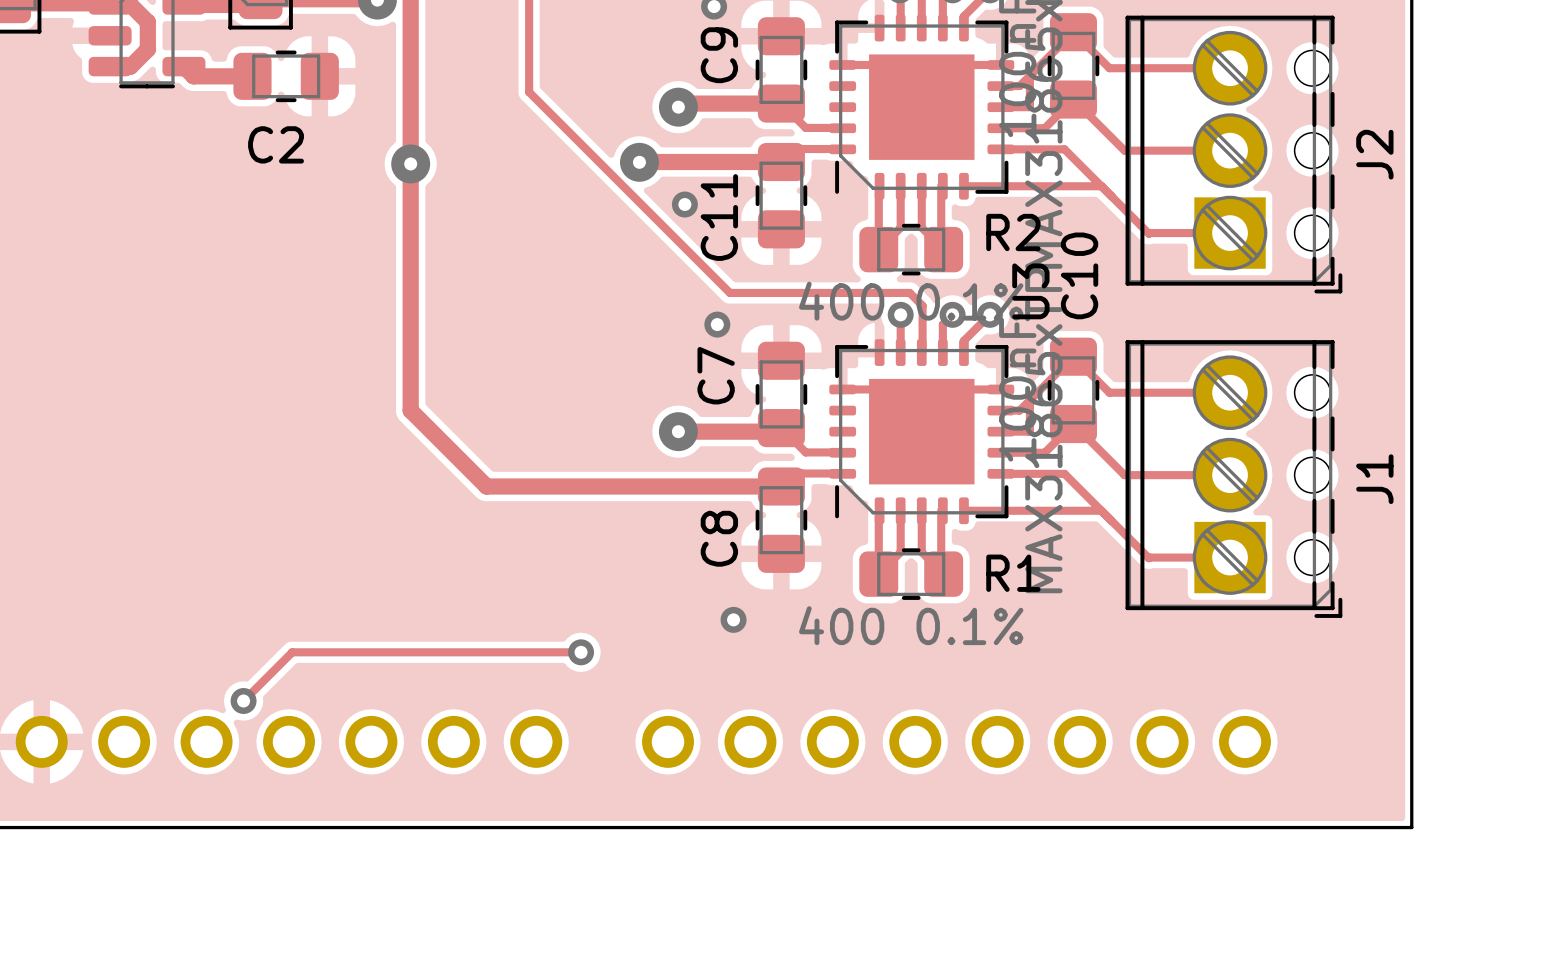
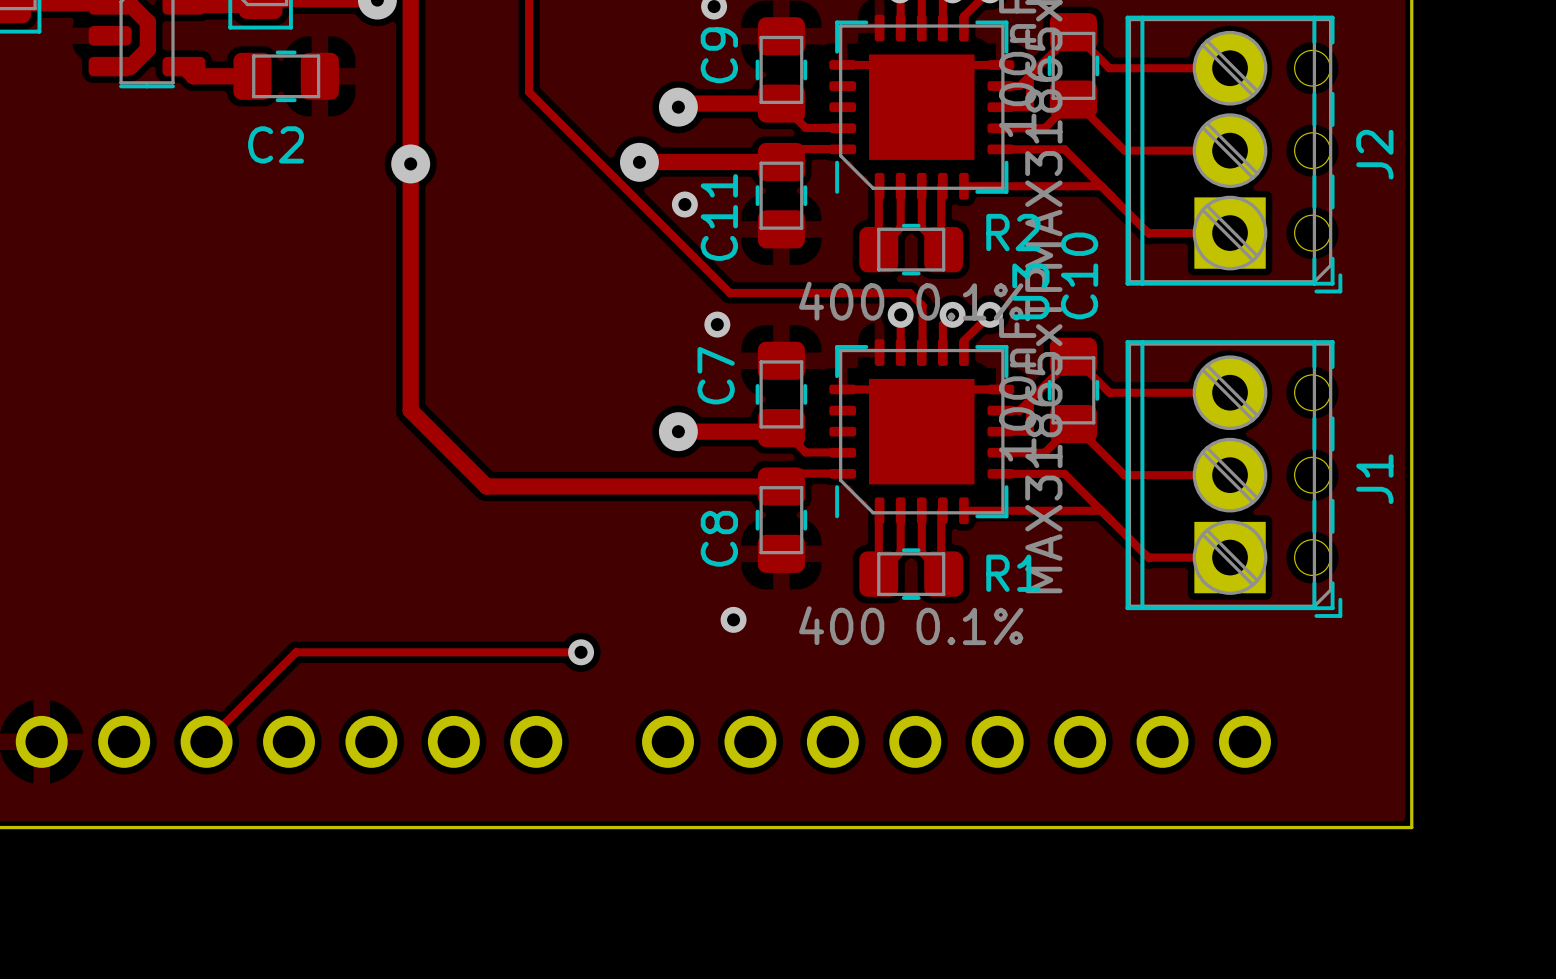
track: (296, 652) (292, 652) (243, 700) -> (296, 652) (206, 741)
via: (243, 700) -> none

